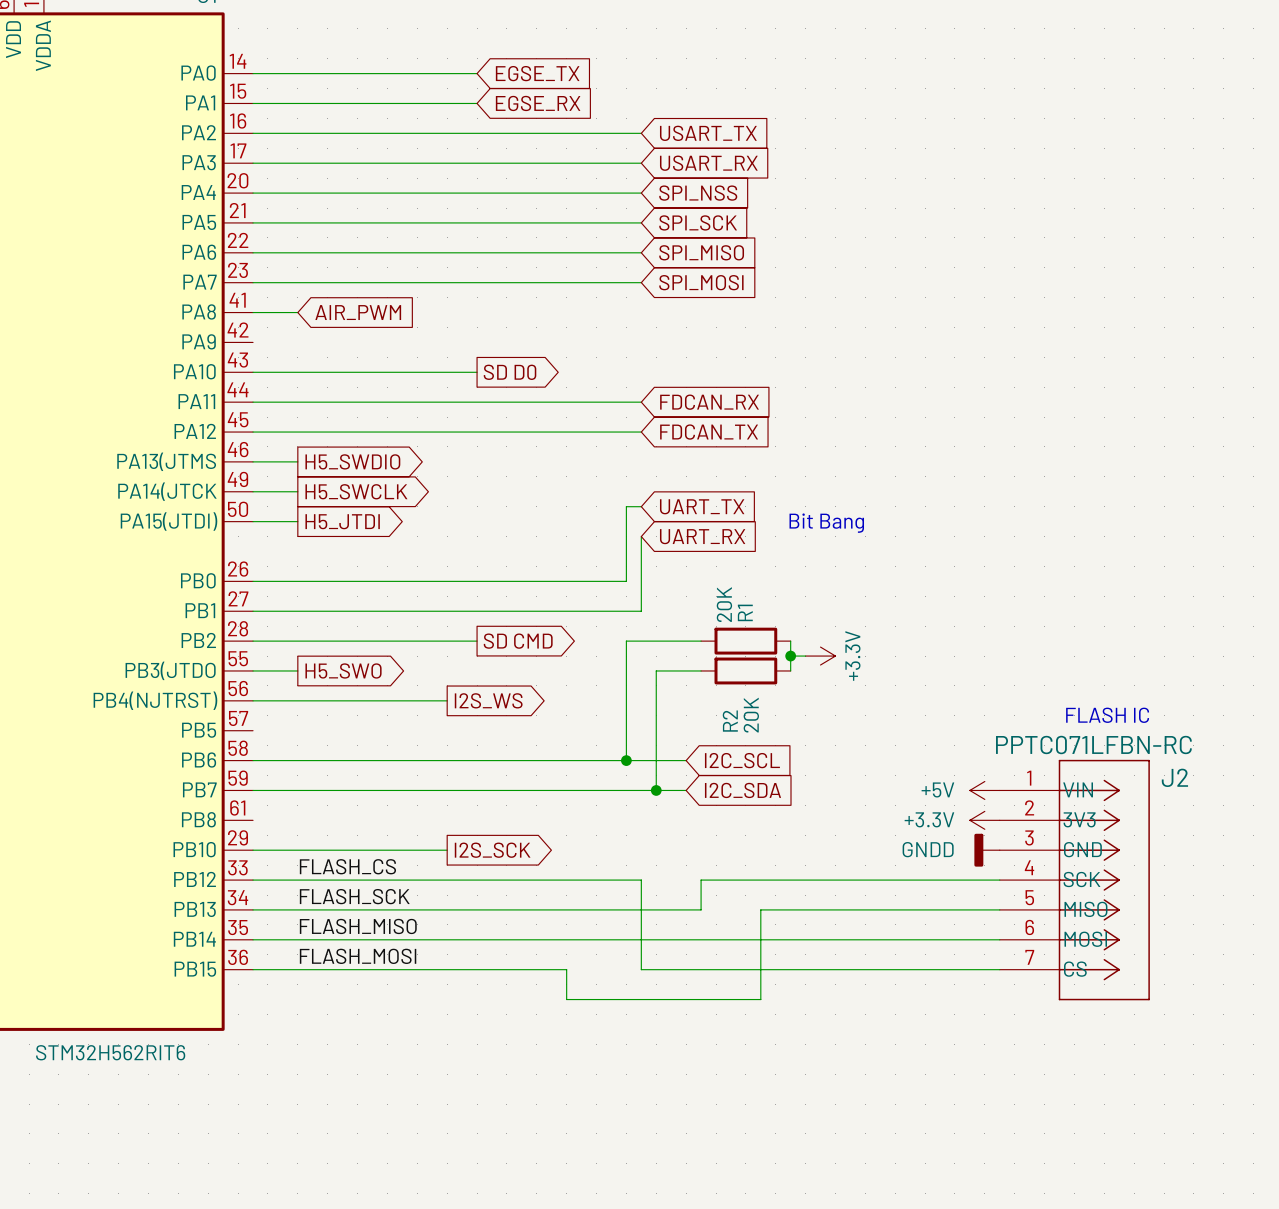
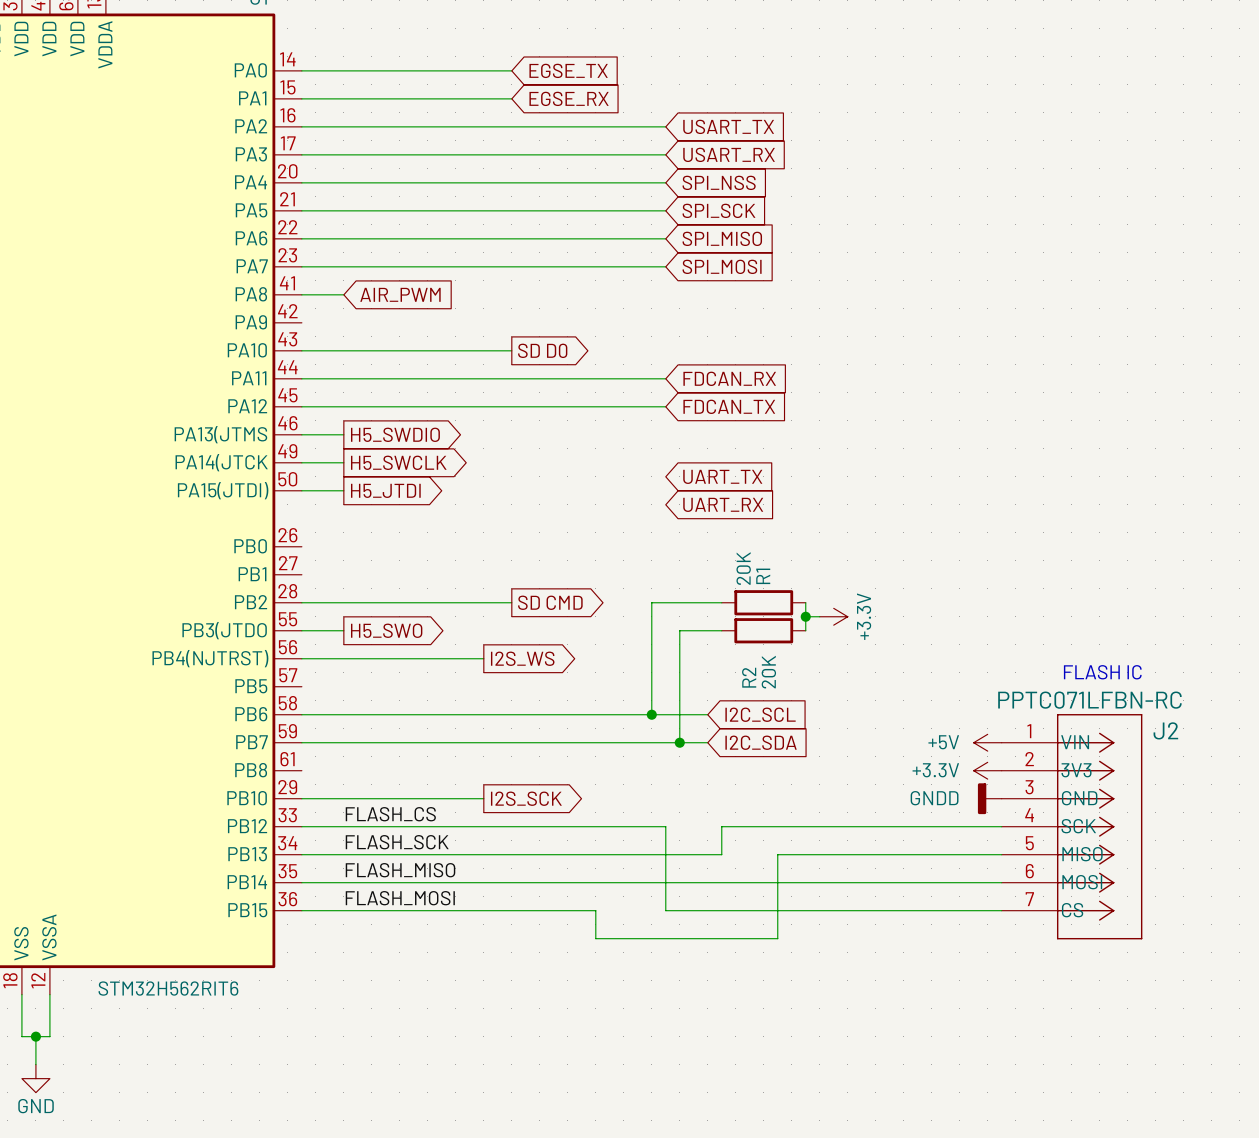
wire: (641, 506) (626, 506) (626, 581) (253, 581) -> none
text: Bit Bang (826, 523) -> none
wire: (641, 536) (641, 611) (253, 611) -> none

